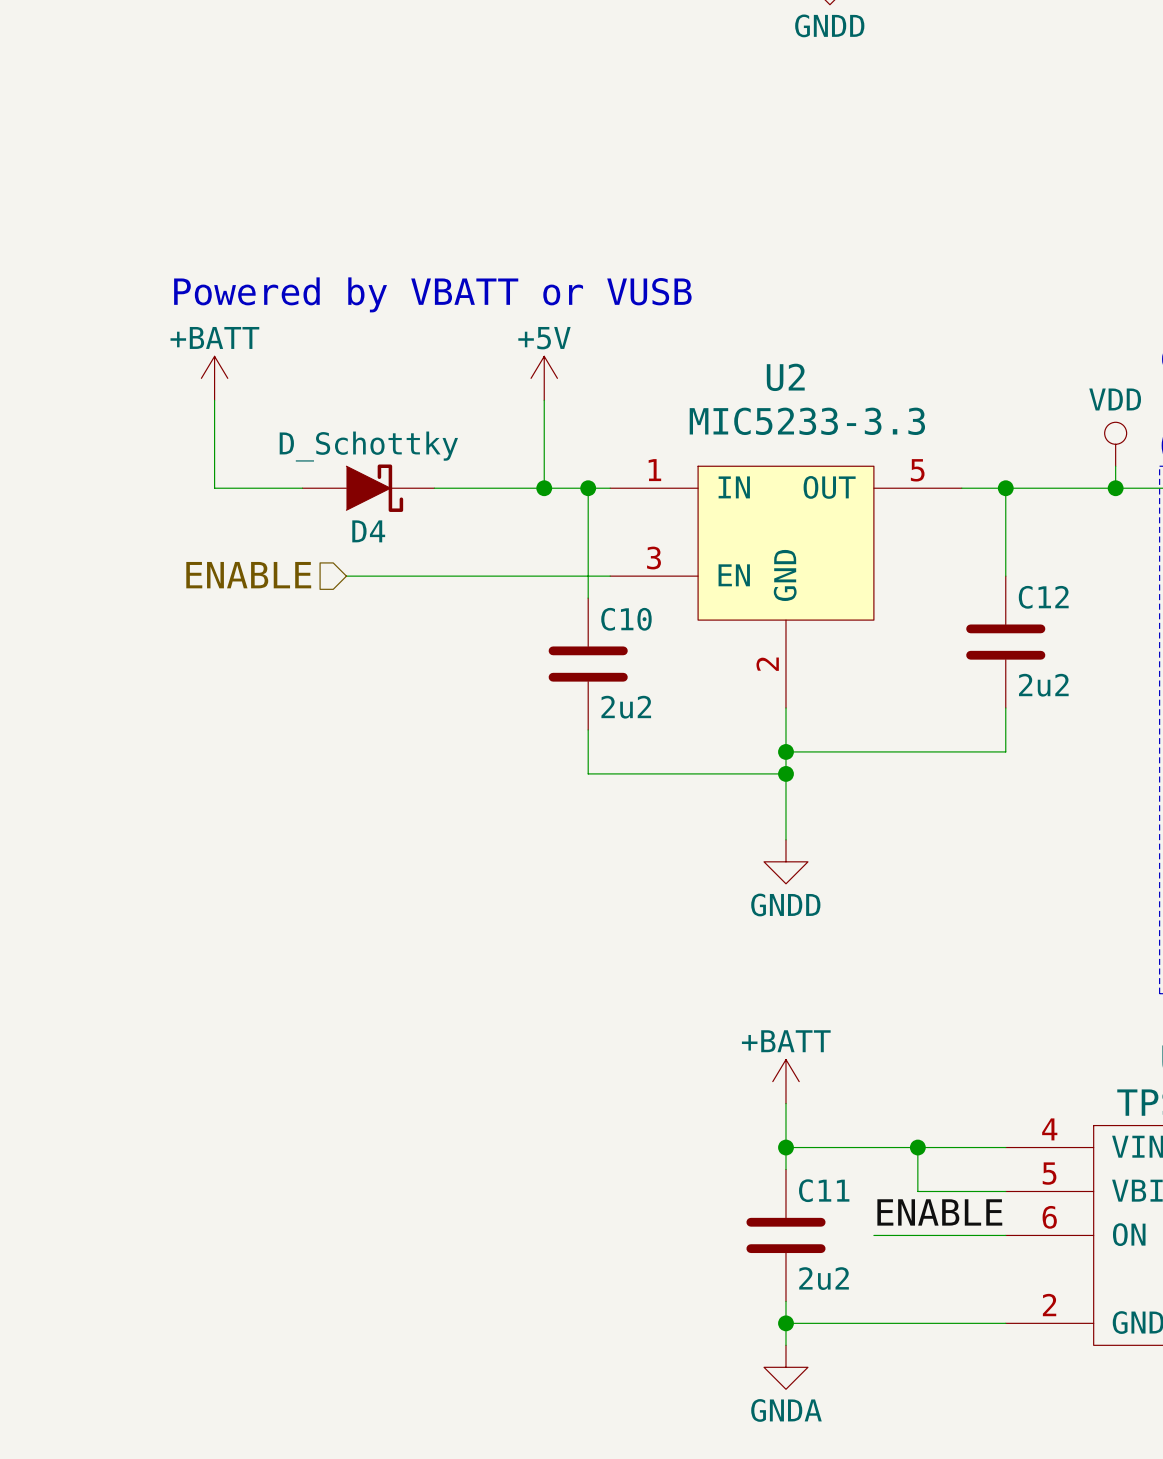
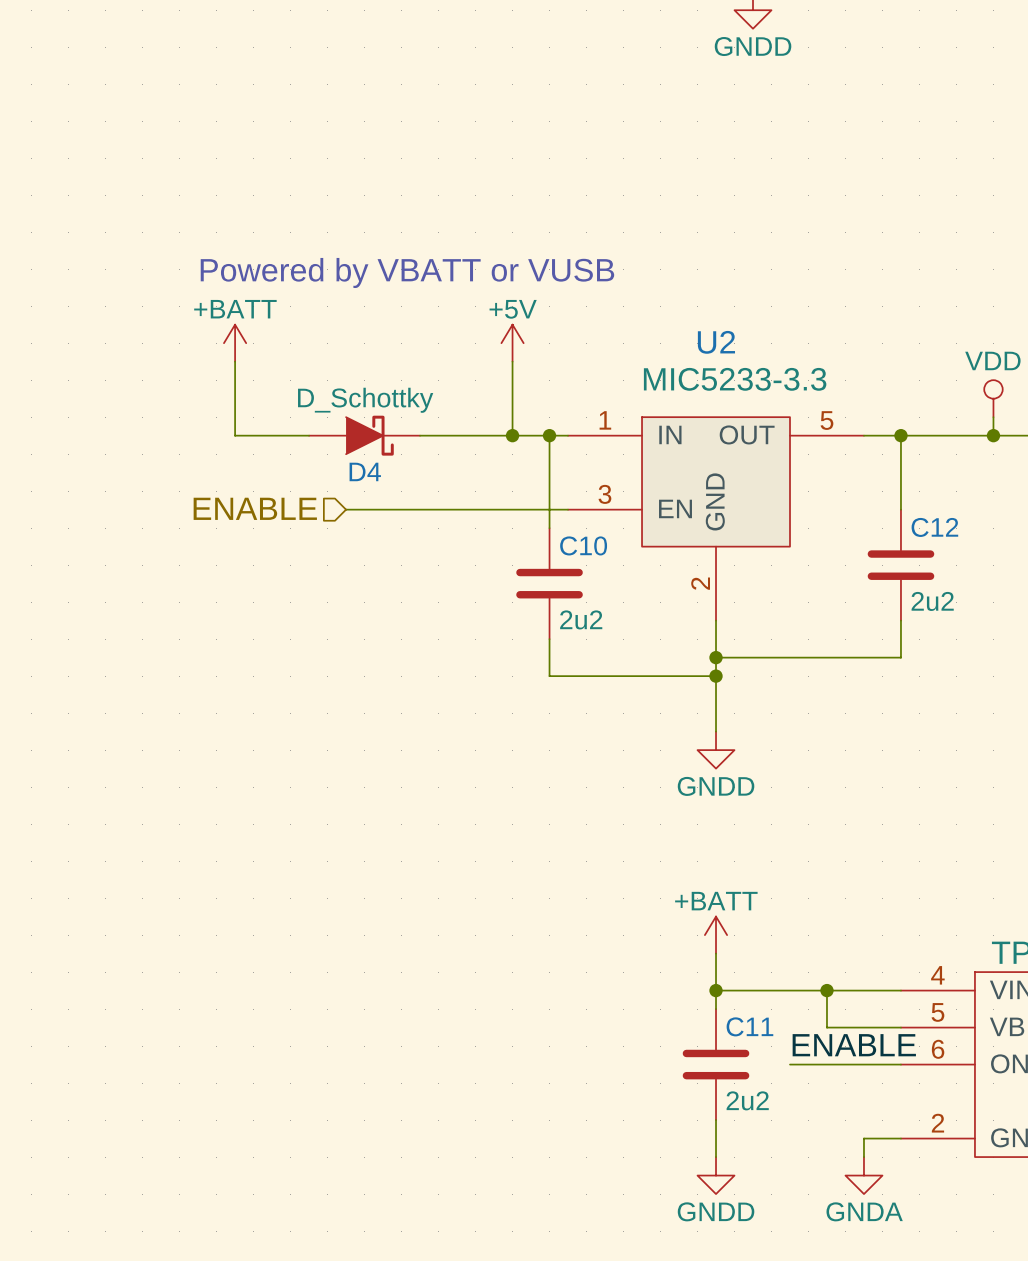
wire: (785, 1323) (961, 1323) -> (863, 1157) (863, 1138)
junction: (785, 1323) -> none
power symbol: GNDA (785, 1367) -> GNDD (716, 1175)
power symbol: none -> GNDA (863, 1175)

